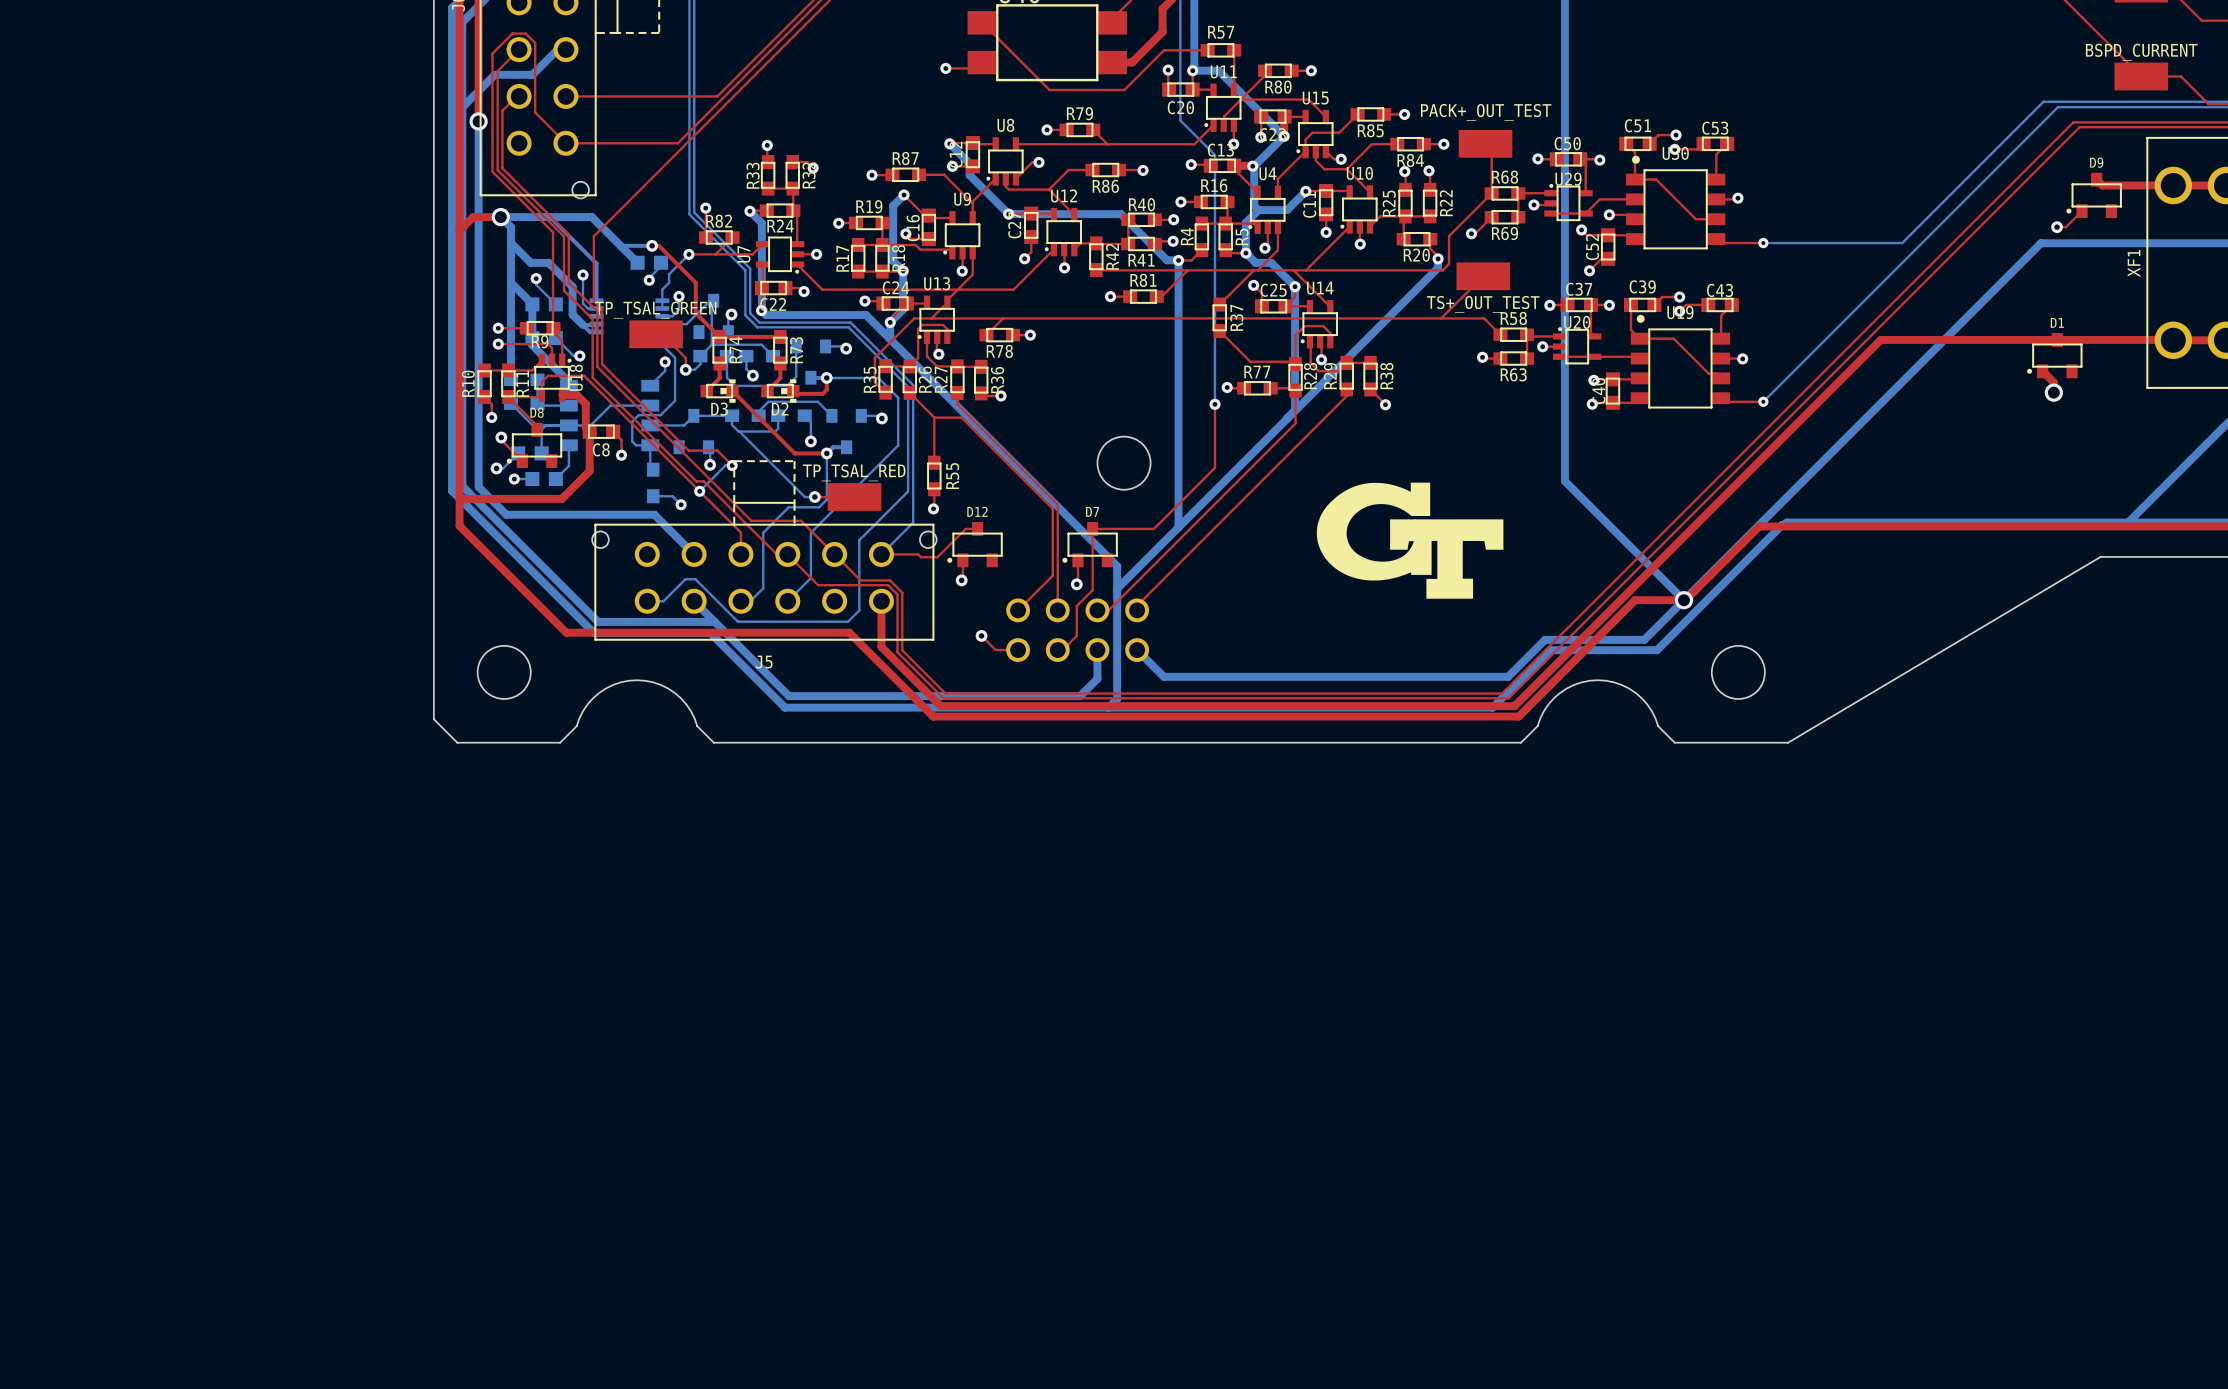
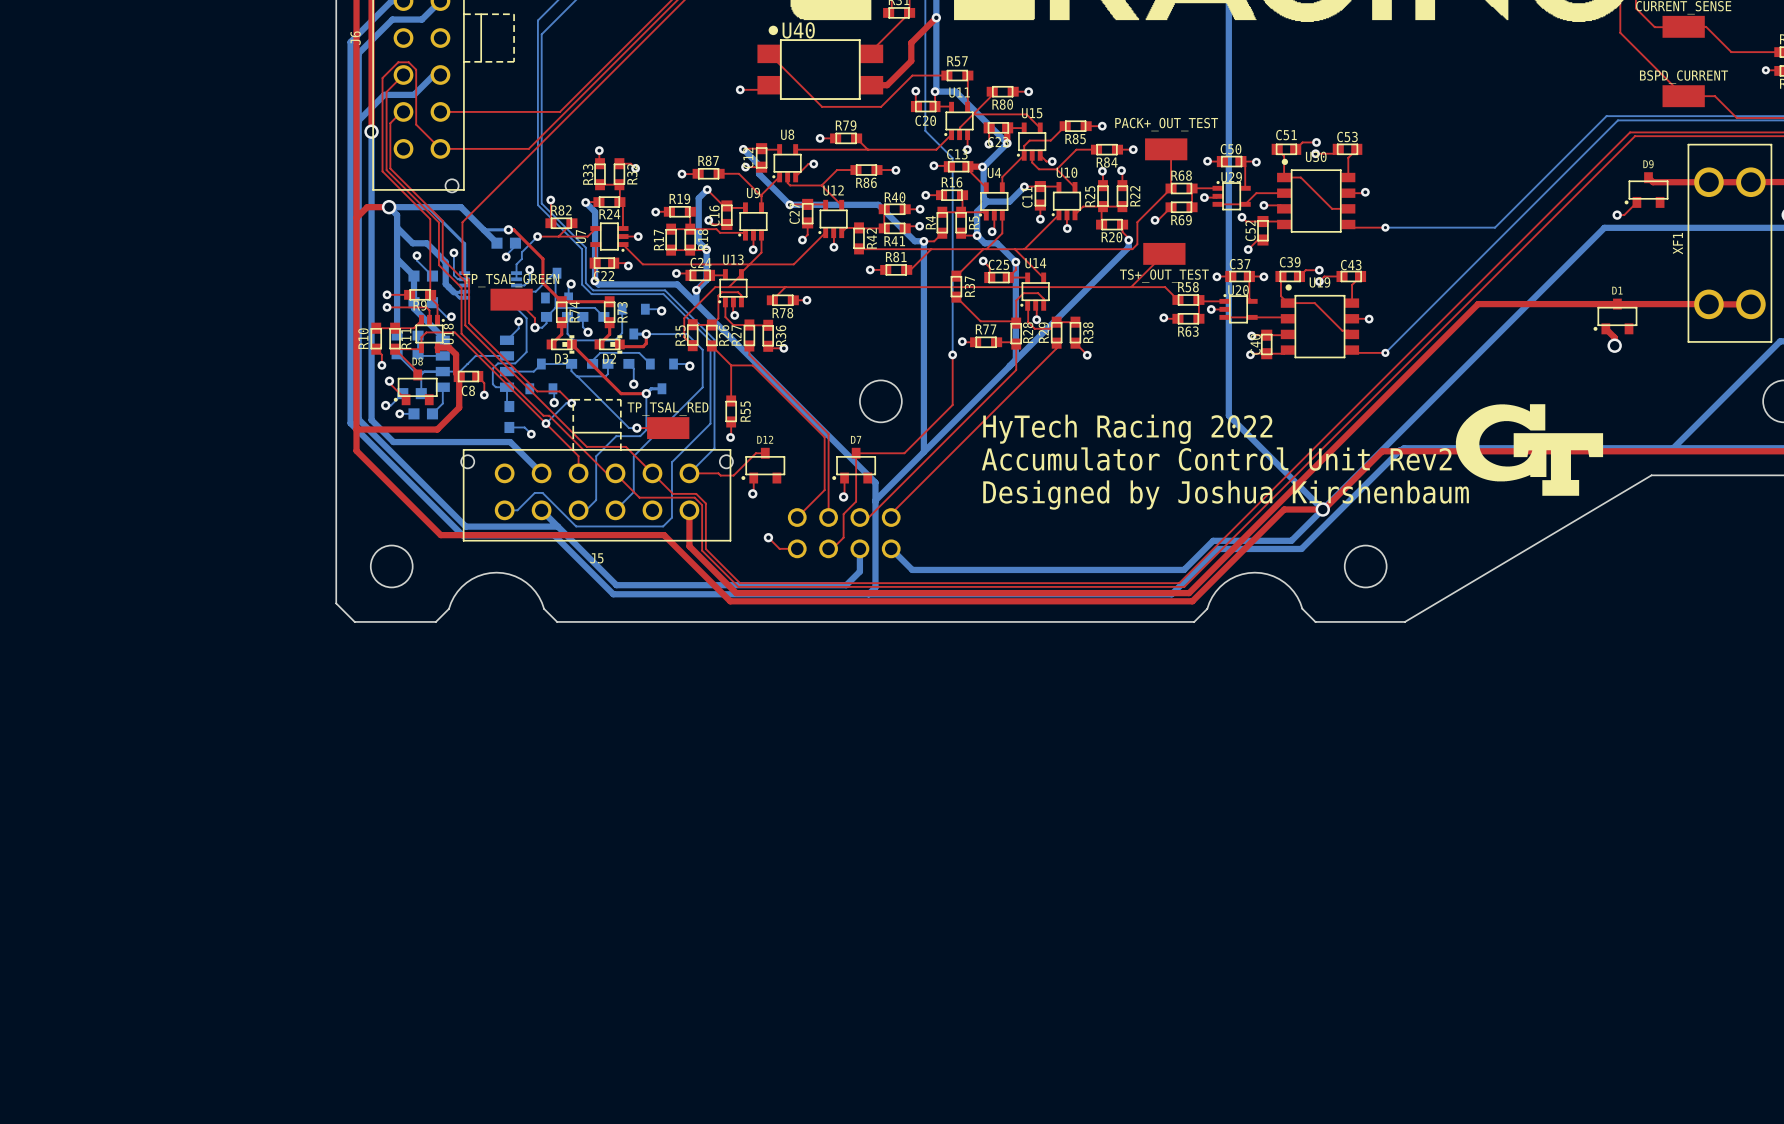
drawing: none -> [1455, 404, 1604, 496]
drawing: [1316, 482, 1504, 599] -> none
text: none -> HyTech Racing 2022 (1127, 429)
text: none -> Accumulator Control Unit Rev2 (1216, 459)
text: none -> Designed by Joshua Kirshenbaum (1226, 495)

